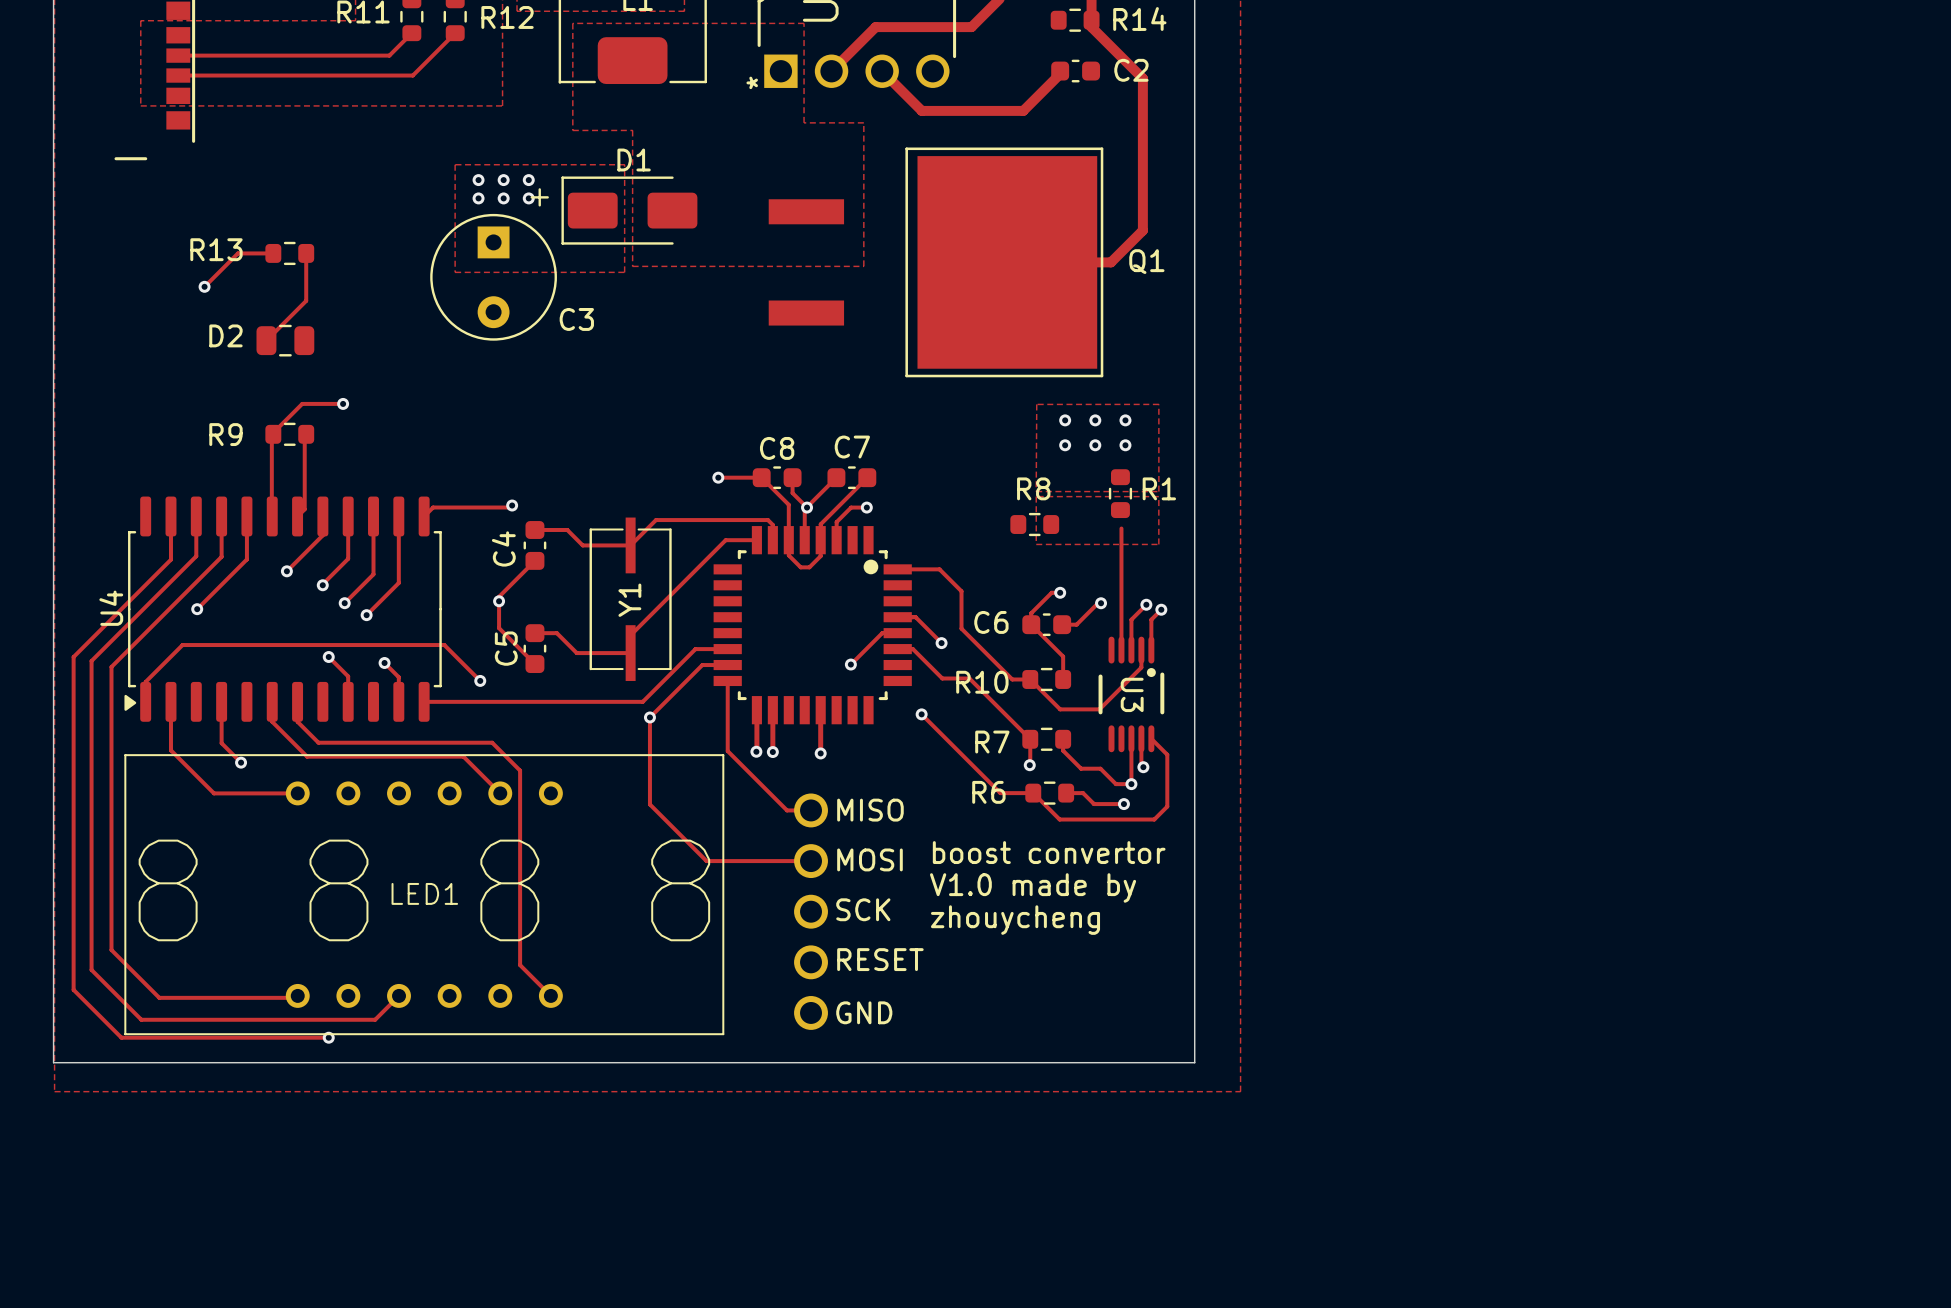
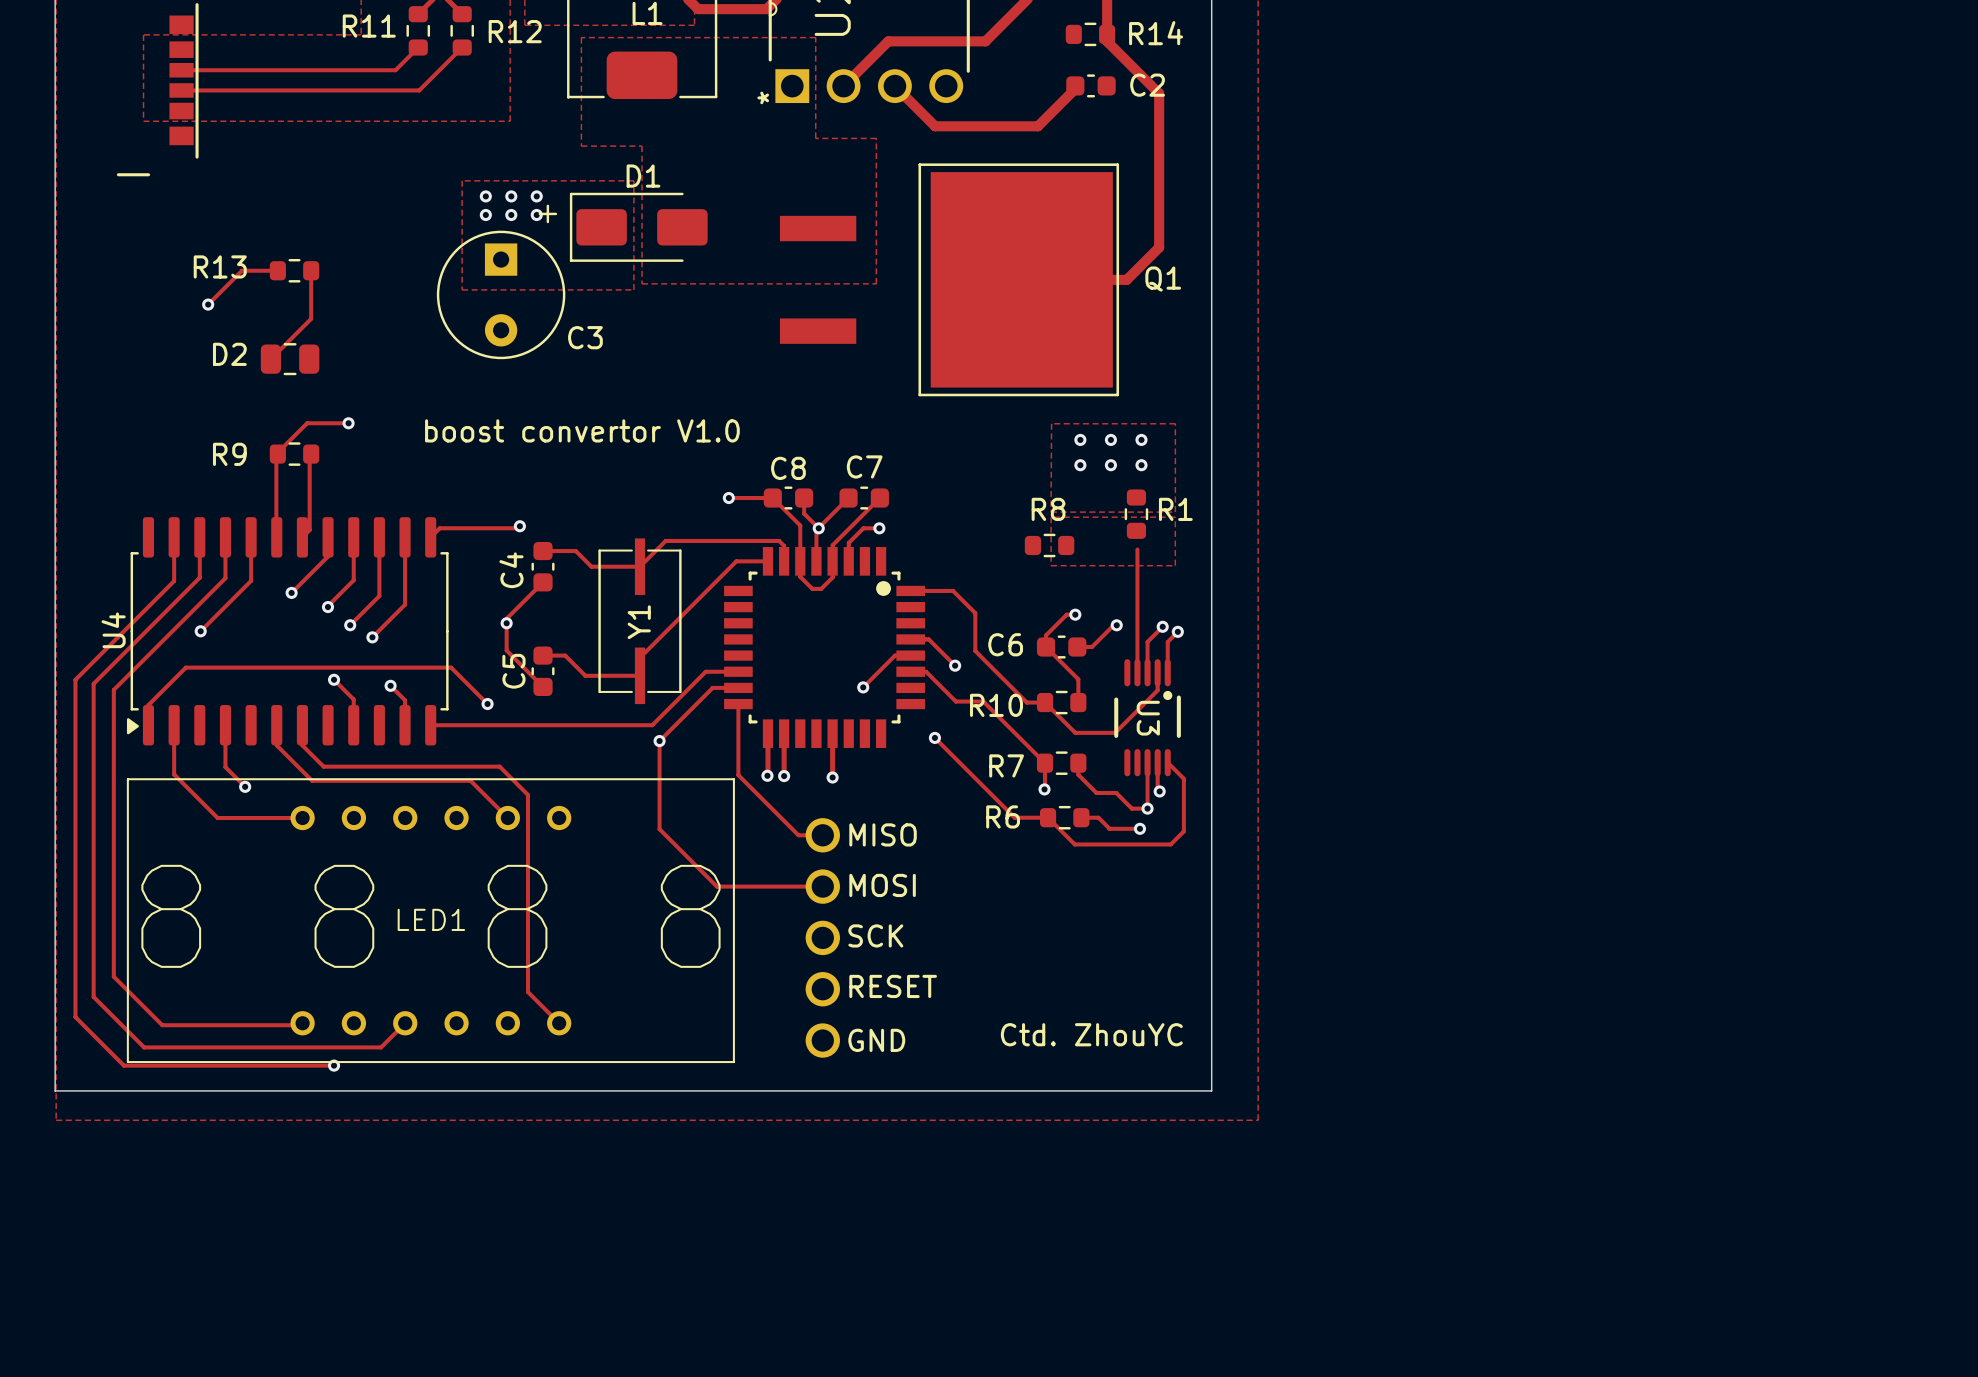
text: none -> boost convertor V1.0 (582, 430)
text: boost convertor (1049, 852) -> none
text: V1.0 made by (1033, 887) -> none
text: zhouycheng (1015, 920) -> none
text: none -> Ctd. ZhouYC (1091, 1034)

